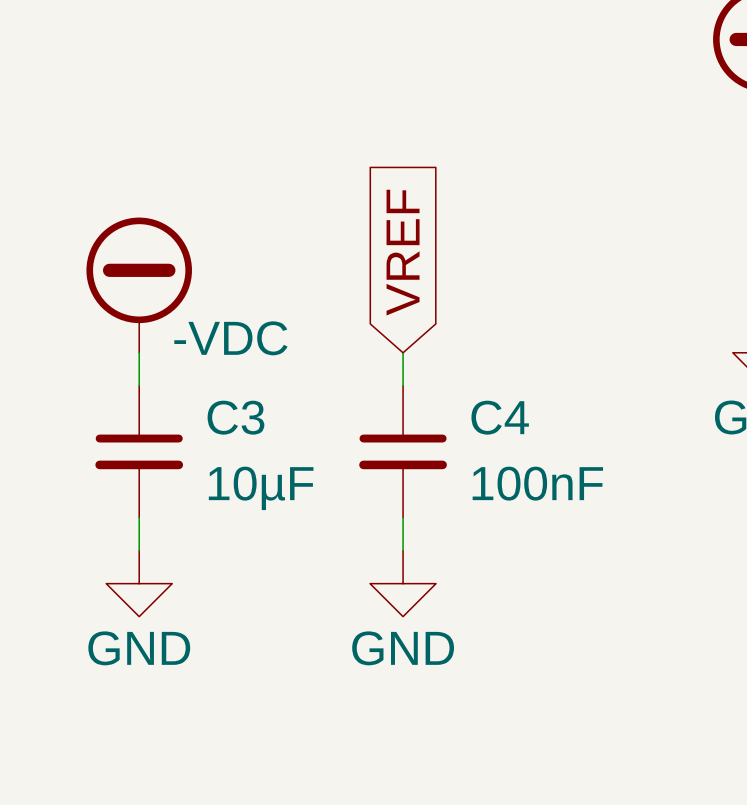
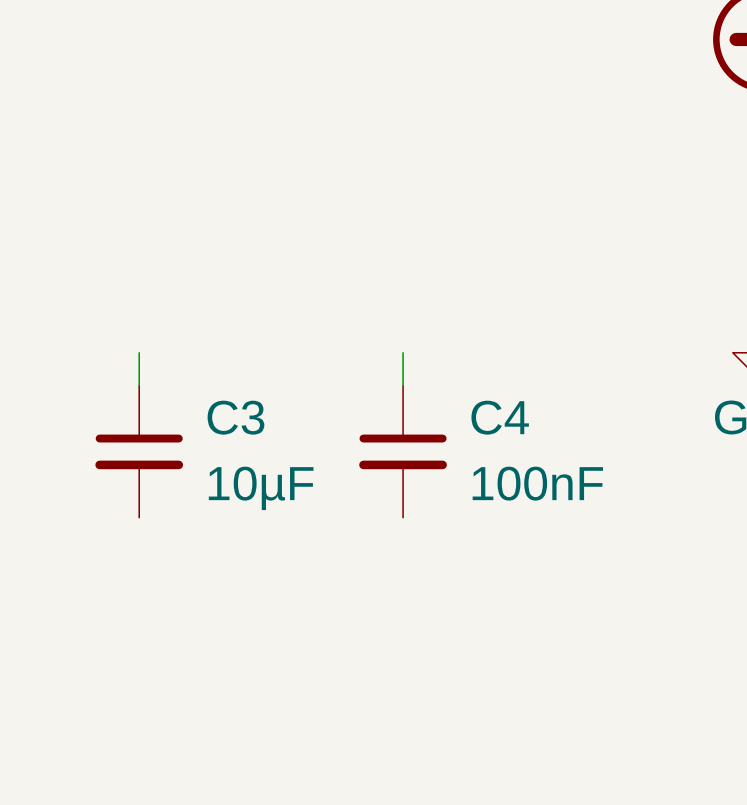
global label: VREF (403, 252) -> none
power symbol: -VDC (139, 285) -> none
wire: (139, 517) (139, 550) -> none
wire: (403, 517) (403, 550) -> none
power symbol: GND (139, 583) -> none
power symbol: GND (403, 583) -> none

